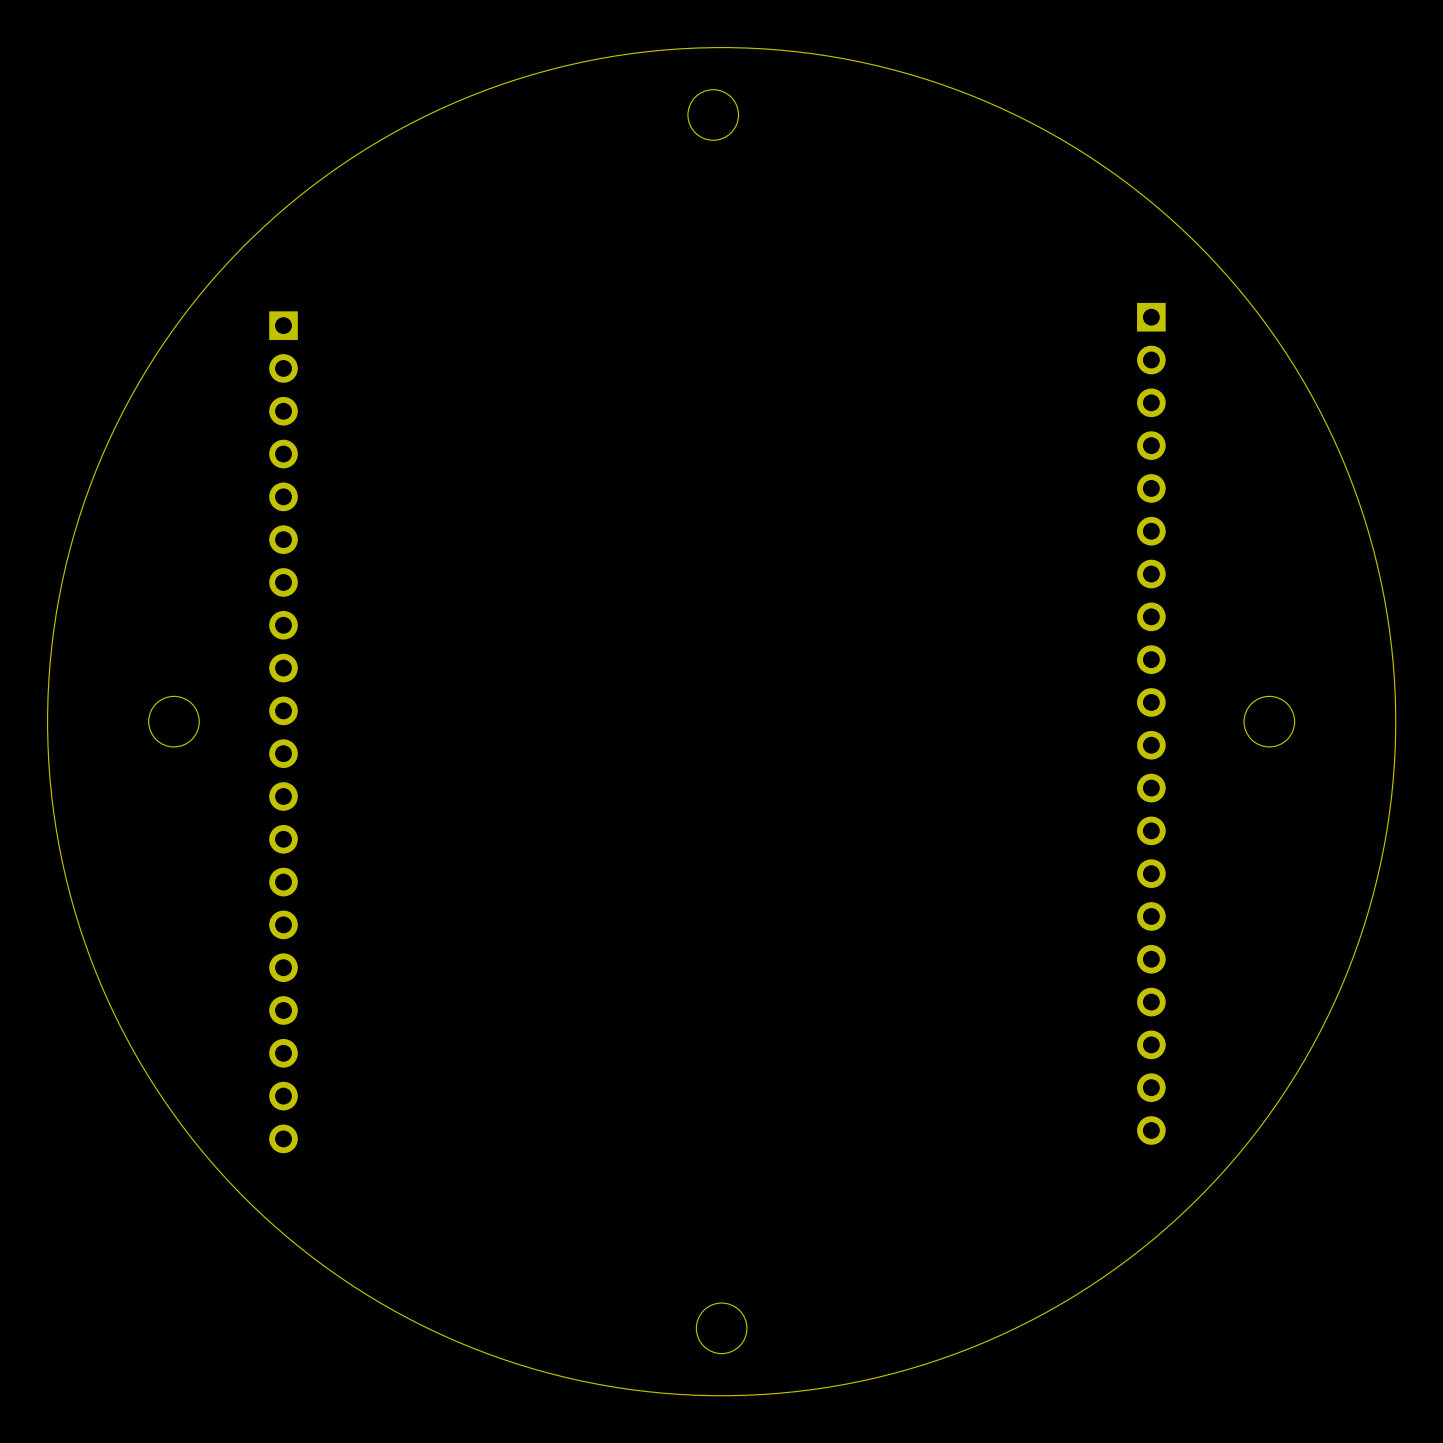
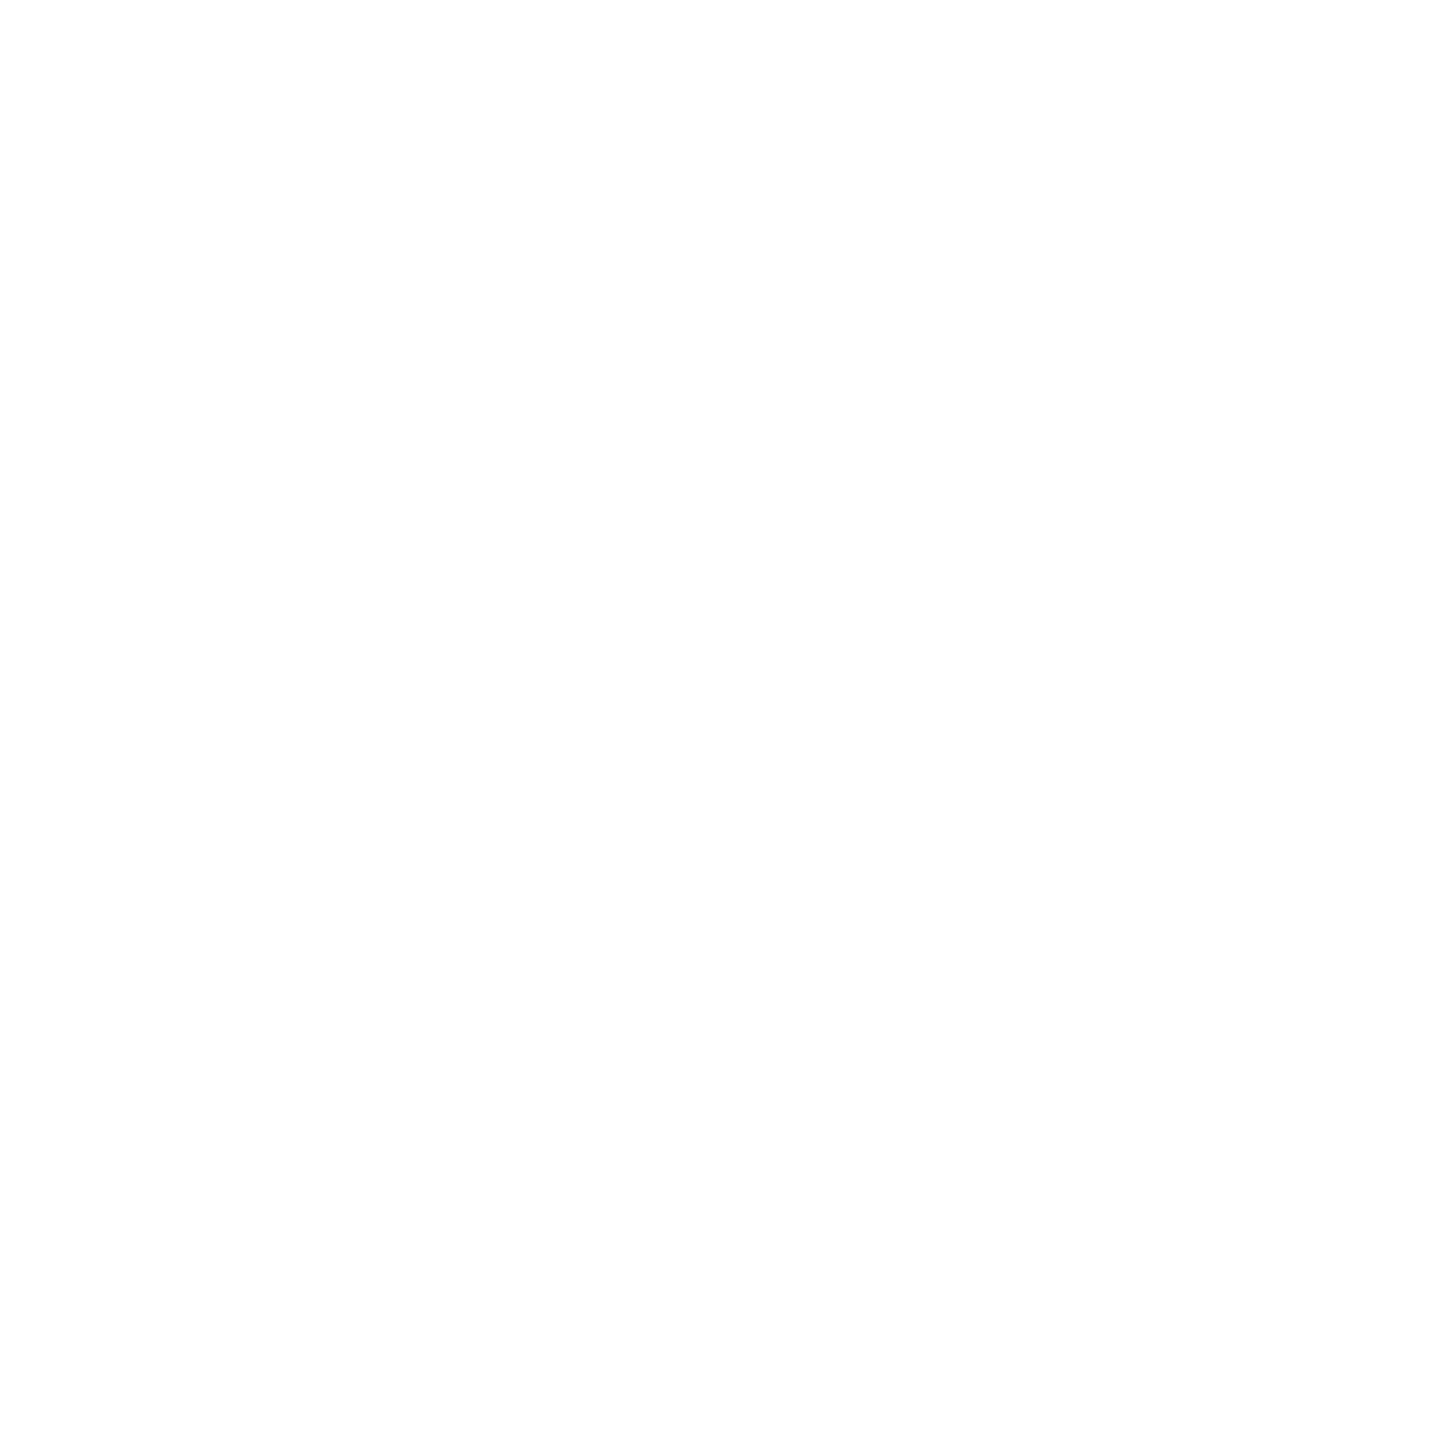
round board edge: [47, 47, 1397, 1397] -> none
round board edge: [687, 89, 739, 141] -> none
round board edge: [148, 695, 200, 748] -> none
round board edge: [1243, 695, 1296, 748] -> none
part: (1151, 723) -> none
part: (283, 732) -> none
round board edge: [695, 1302, 748, 1355] -> none

